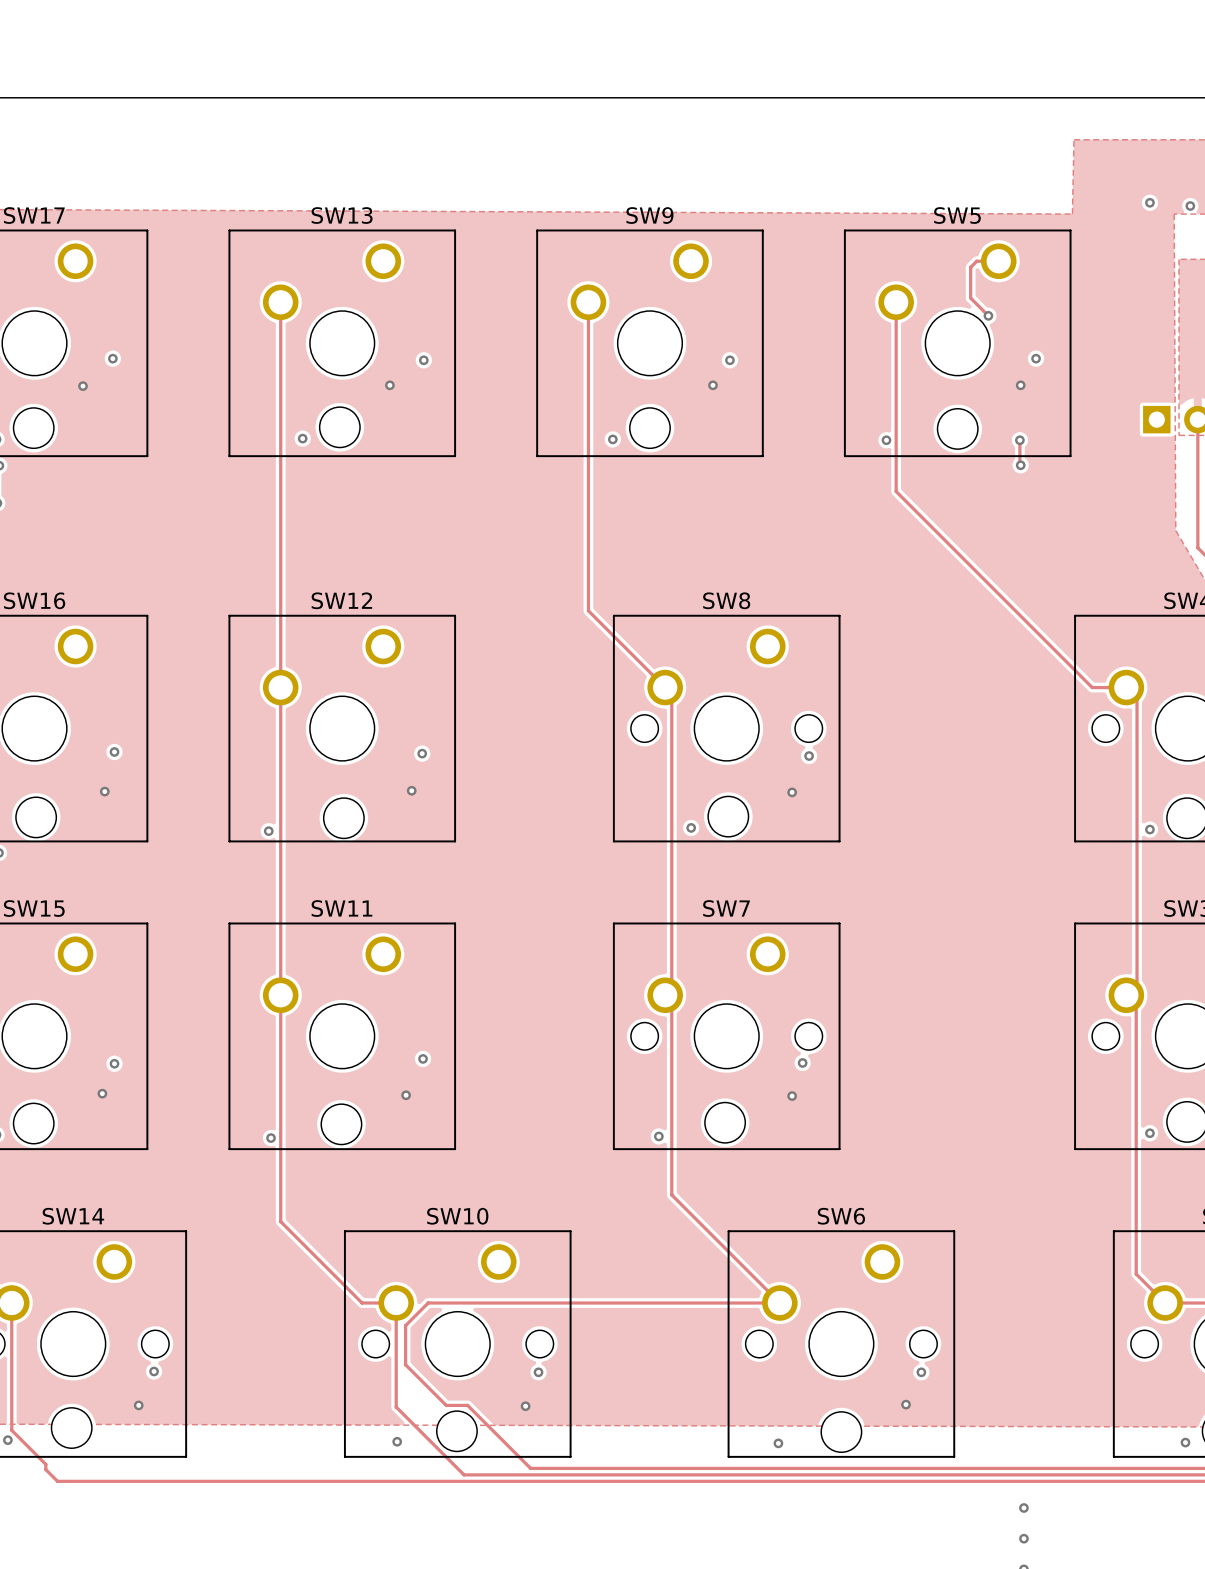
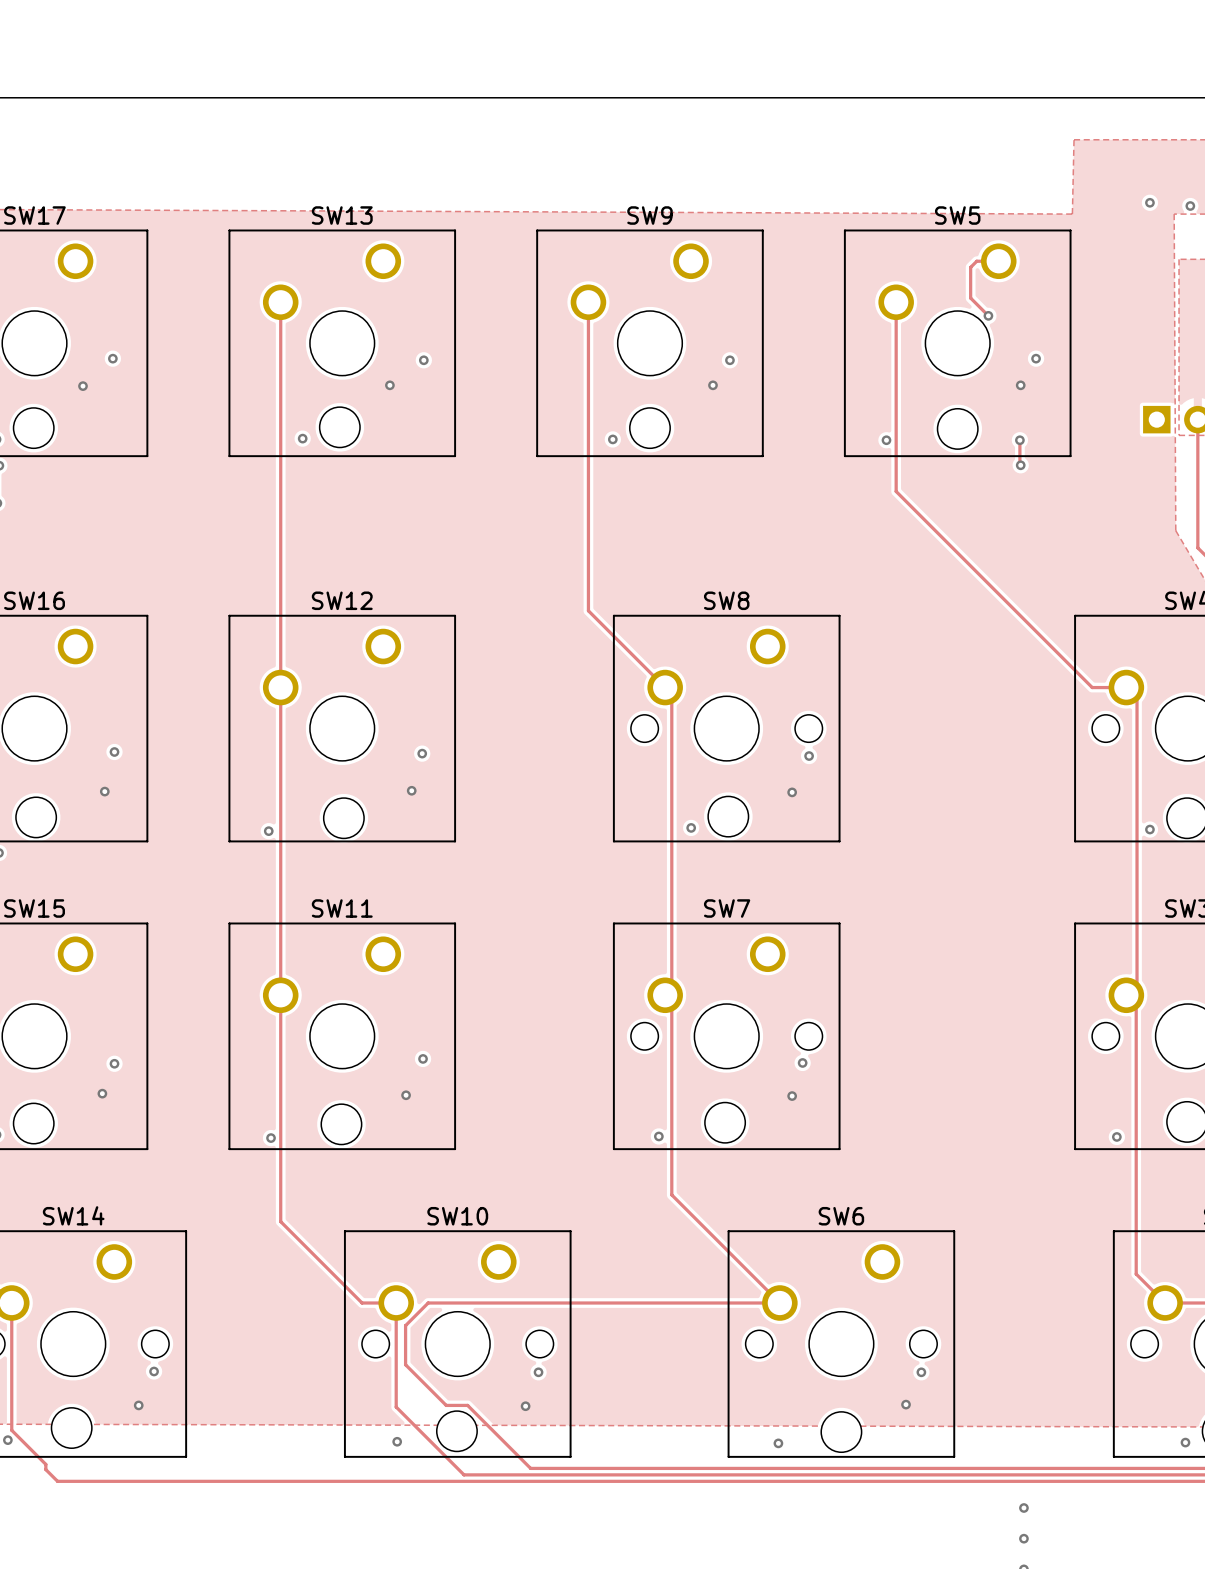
via position: (1149, 1133) -> (1116, 1136)

